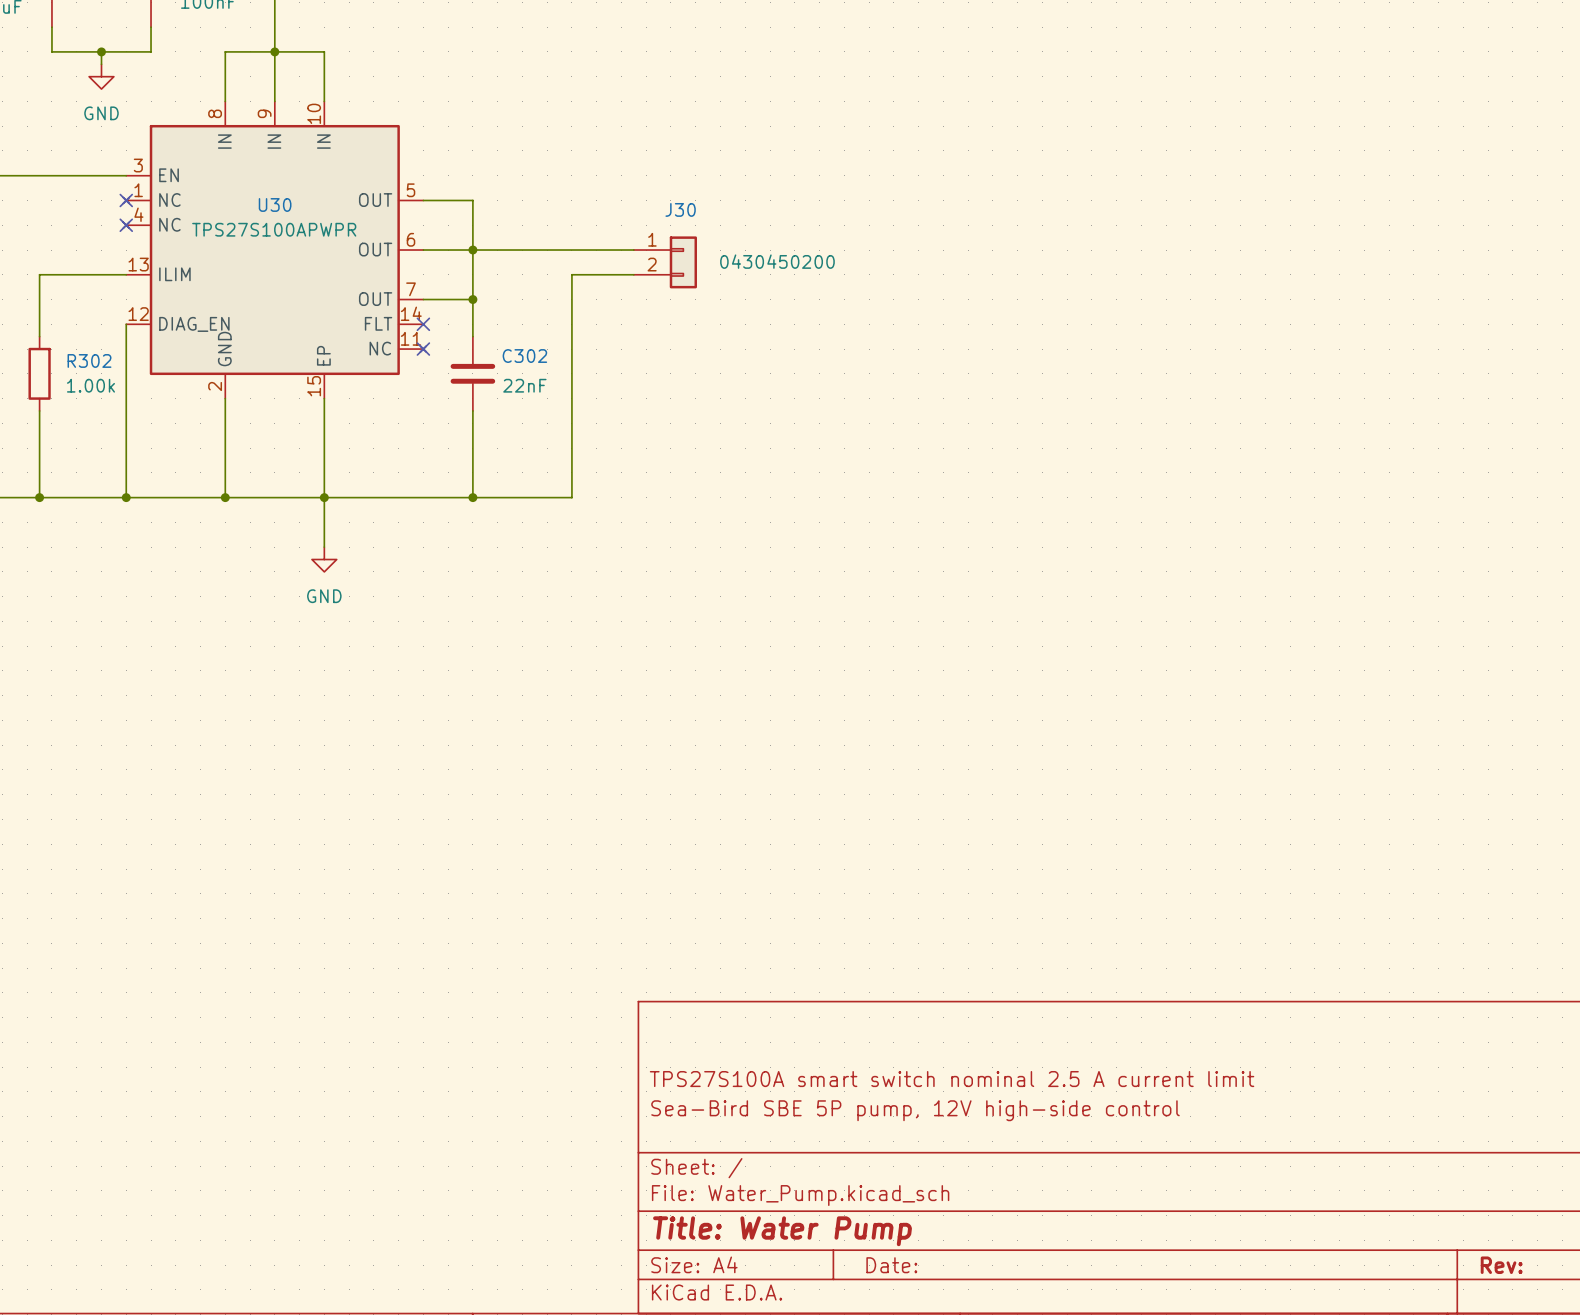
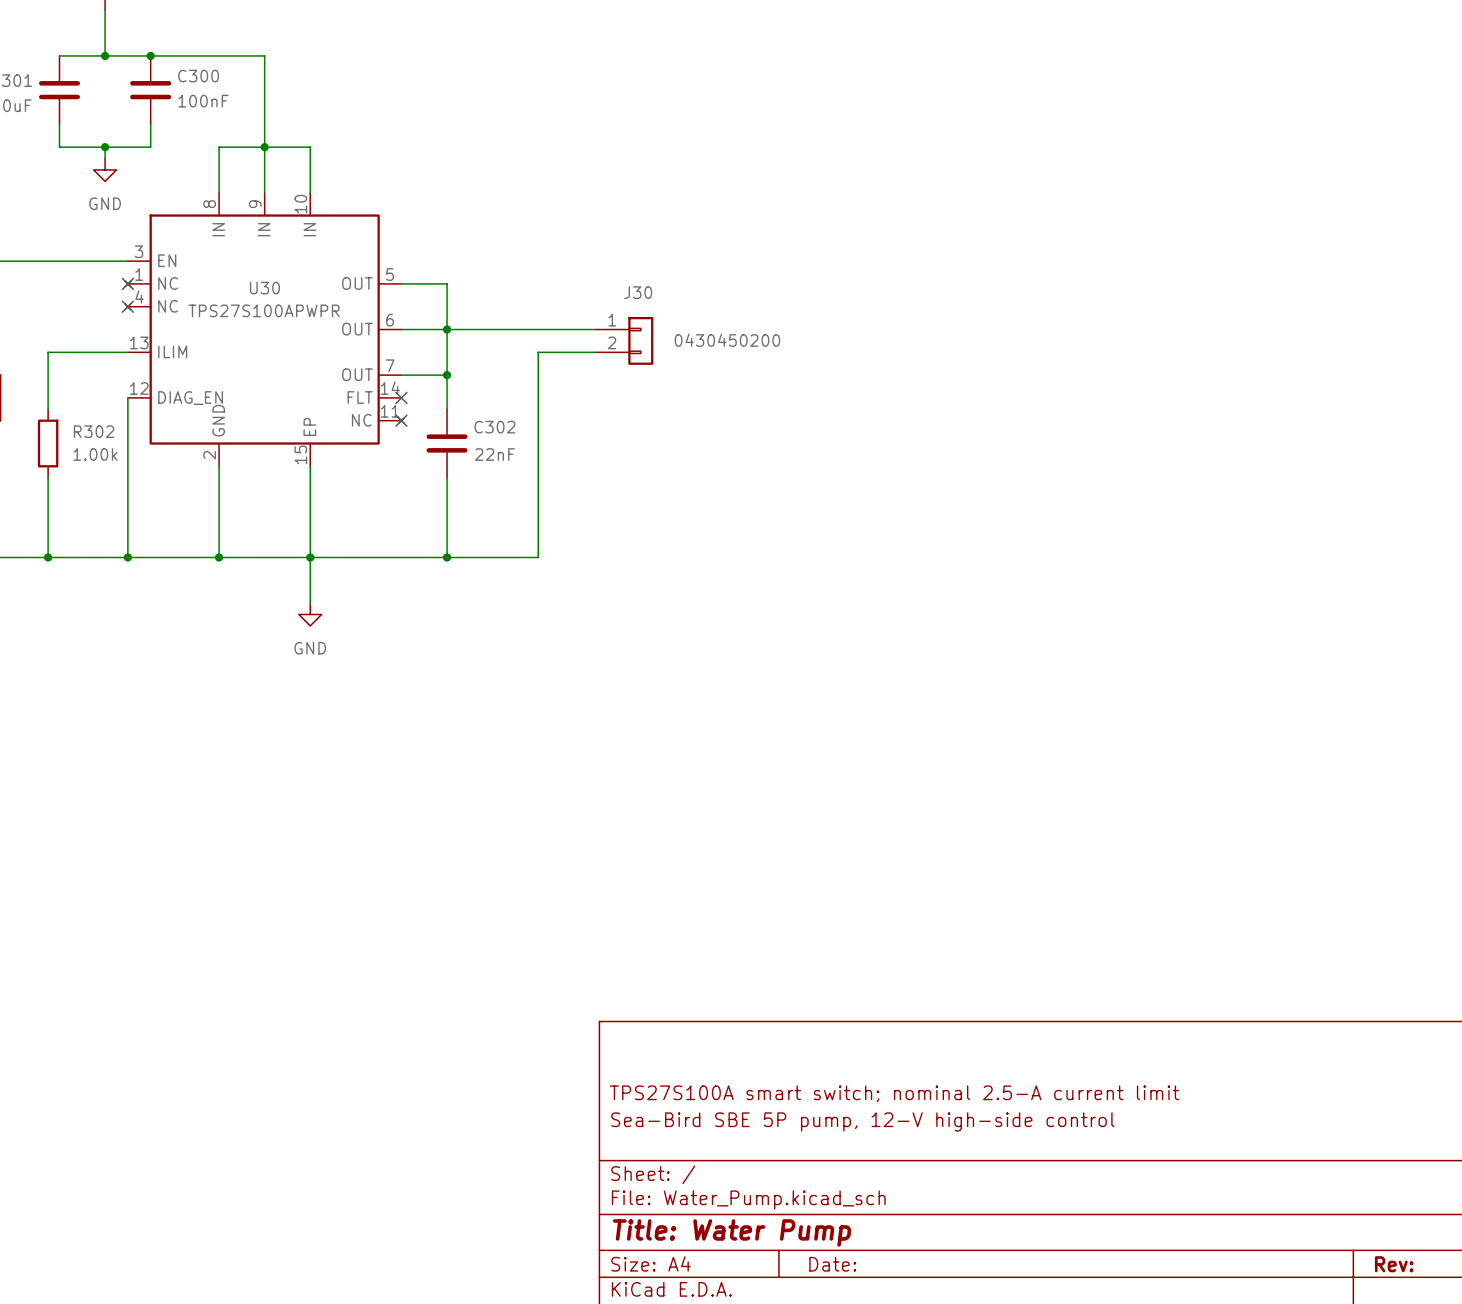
title block: TPS27S100A smart switch nominal 2.5 A current limit (952, 1079) -> TPS27S100A smart switch; nominal 2.5-A current limit (894, 1093)
title block: Sea-Bird SBE 5P pump, 12V high-side control (915, 1110) -> Sea-Bird SBE 5P pump, 12-V high-side control (862, 1121)

